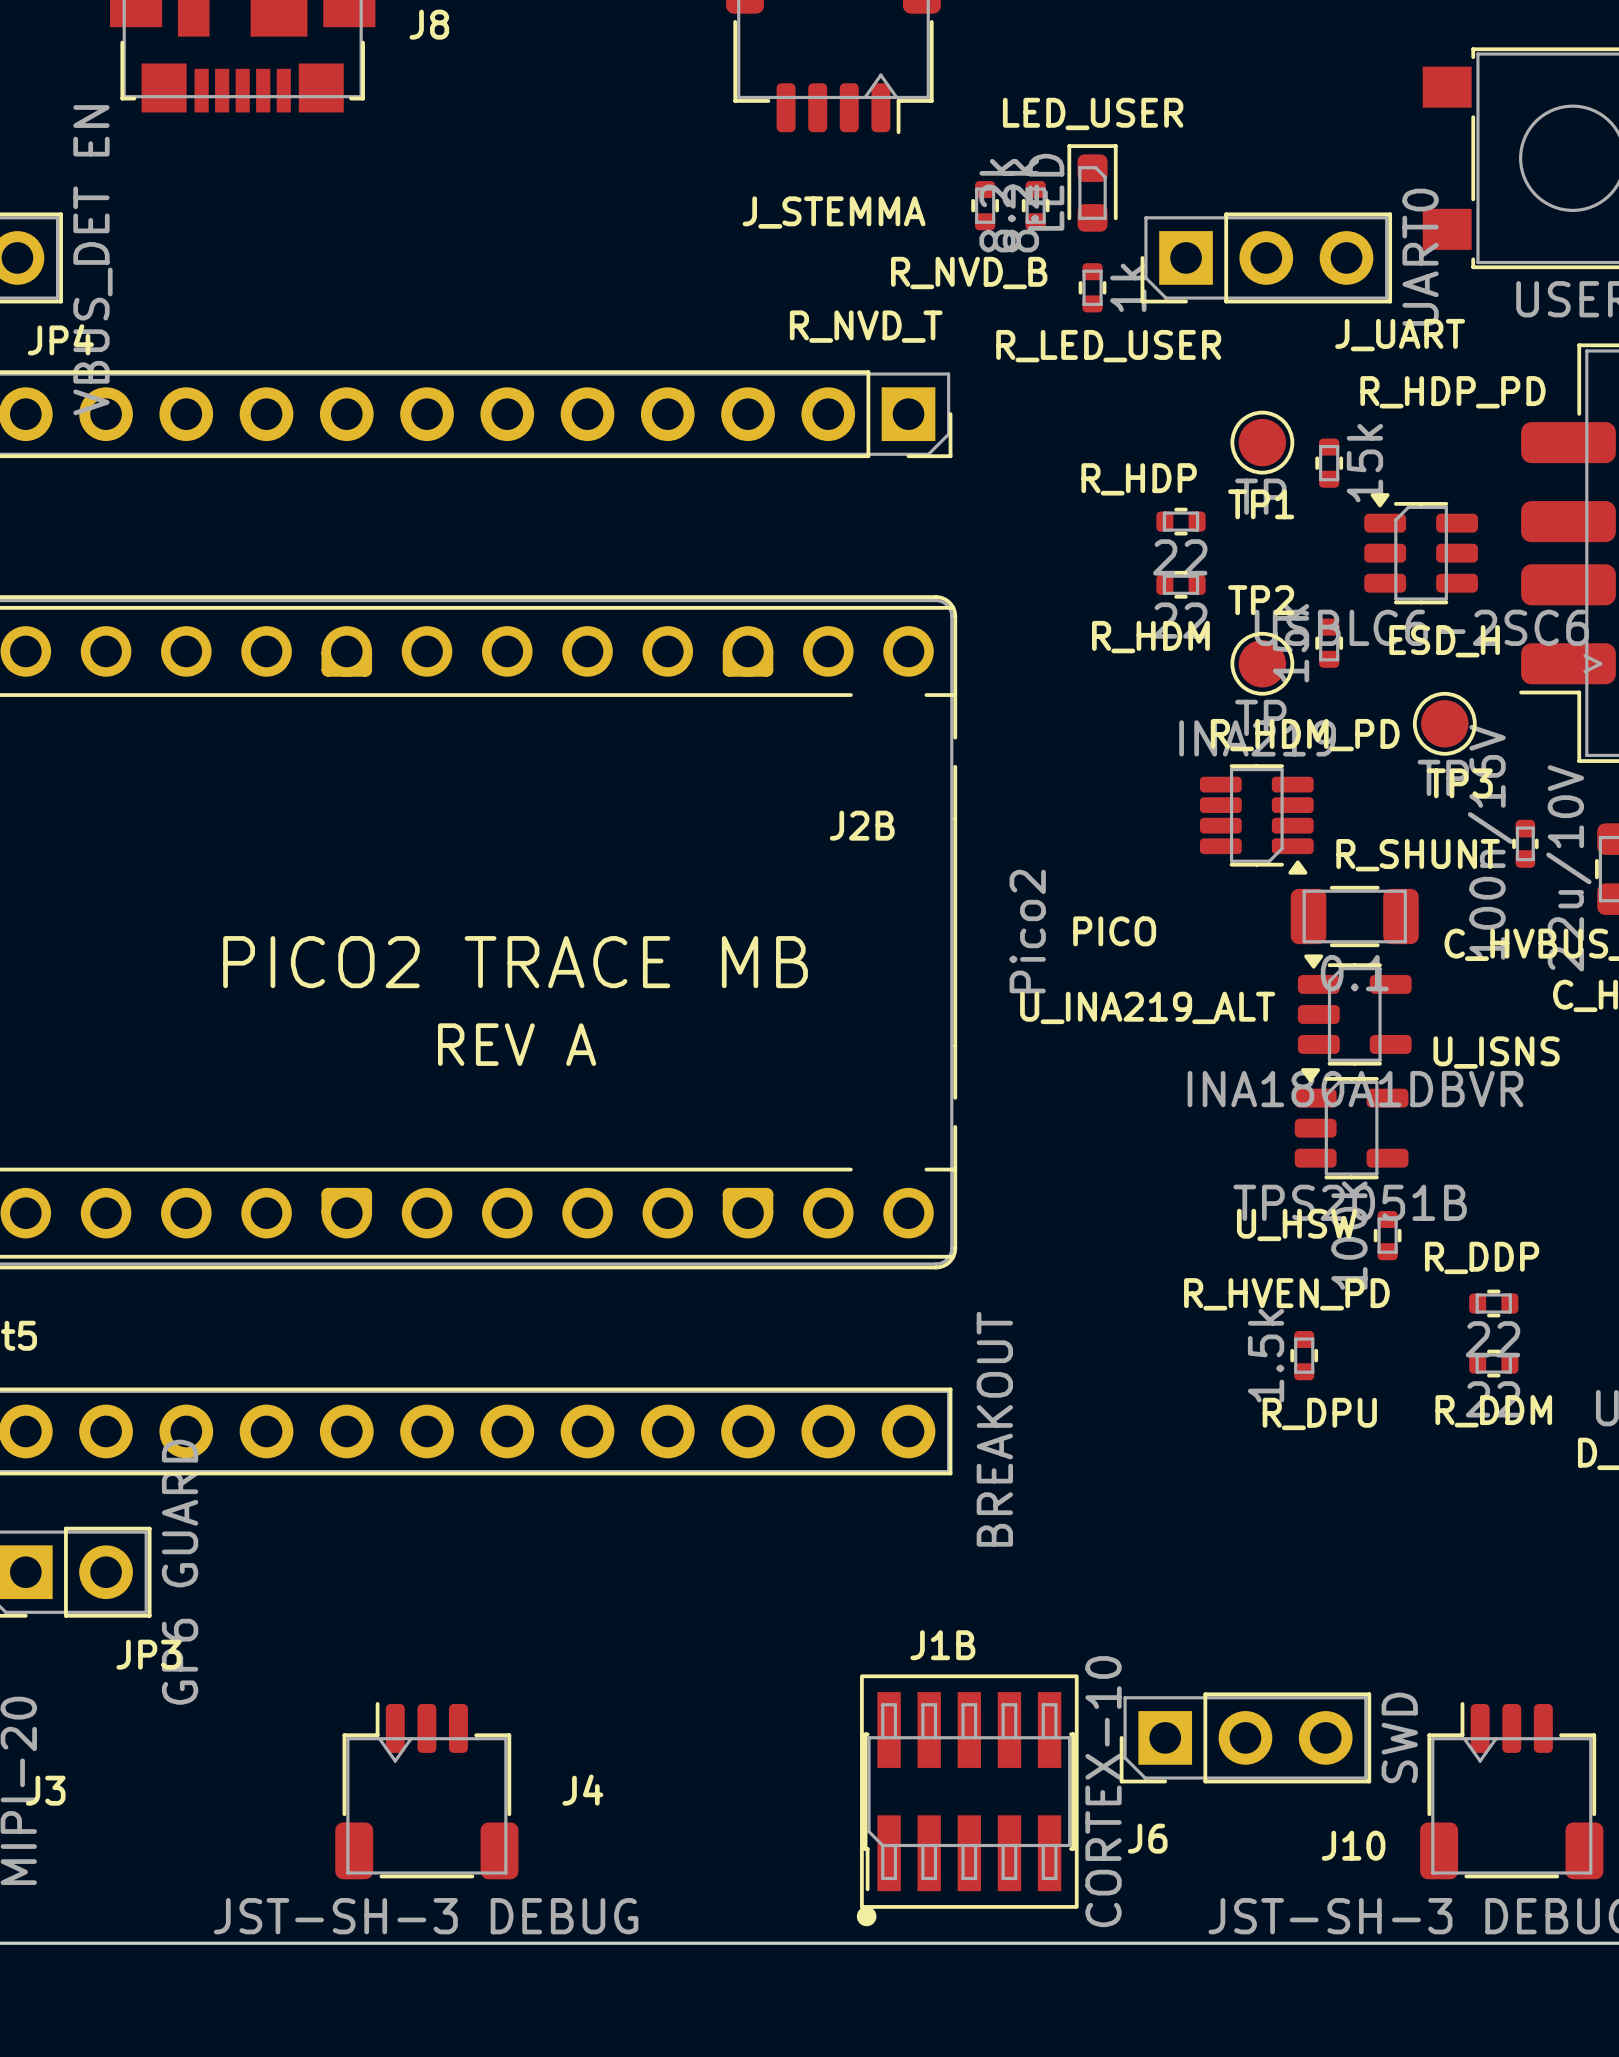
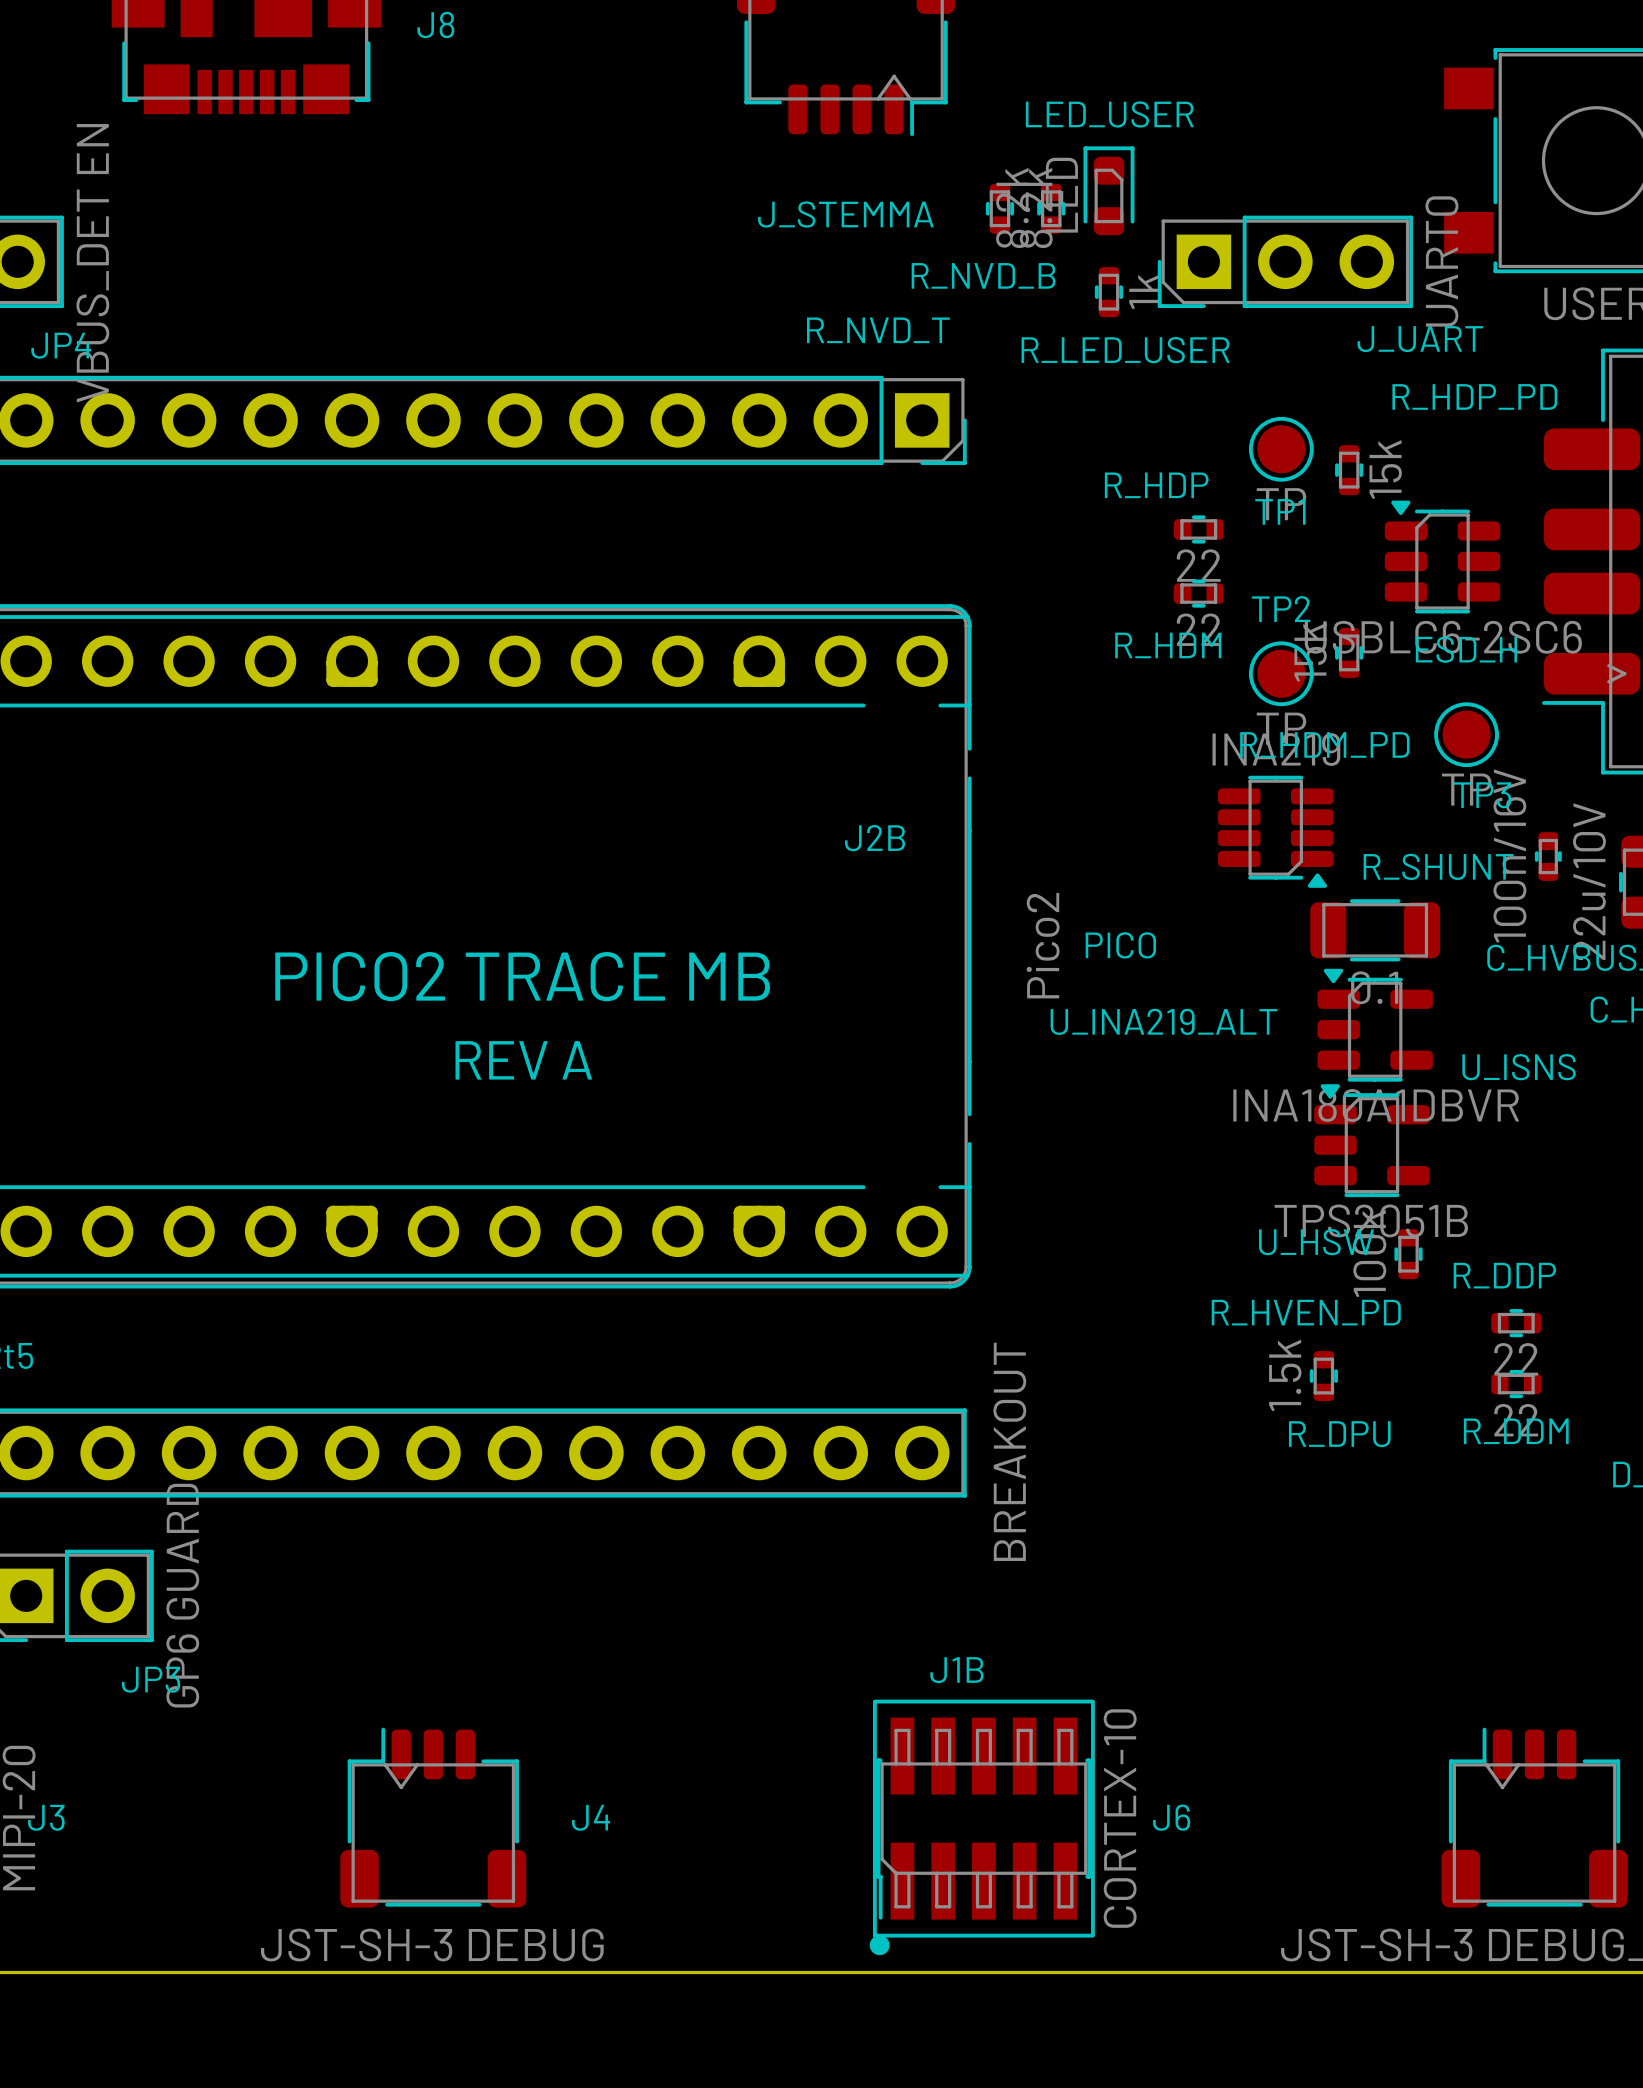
J10: SWD (1245, 1737) -> none
J6 name position: J6 (1147, 1838) -> J6 (1171, 1817)

